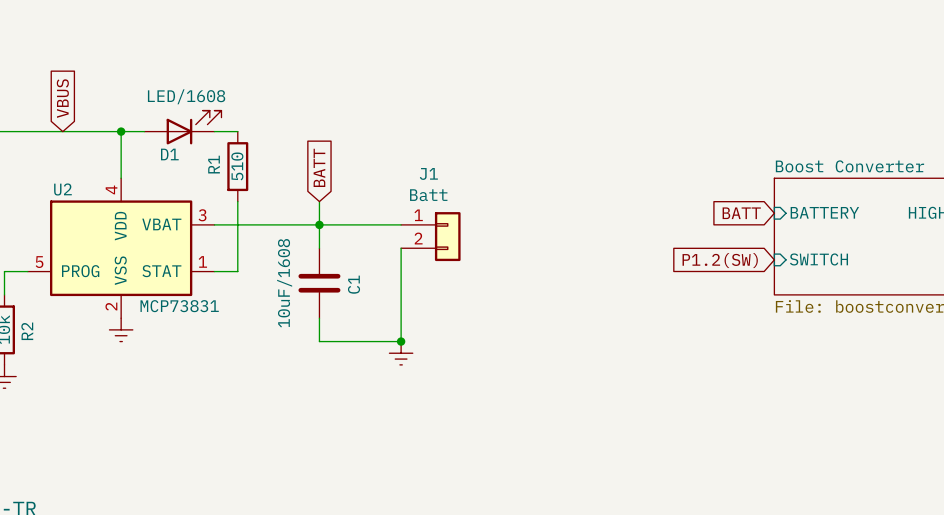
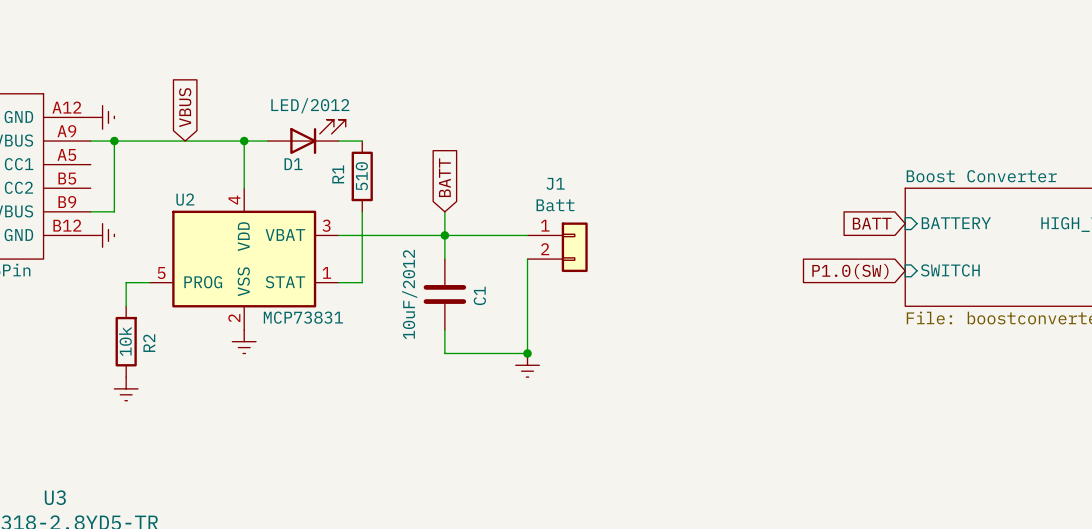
D1 value: LED/1608 (186, 96) -> LED/2012 (310, 105)
global label: P1.2(SW) (720, 260) -> P1.0(SW) (850, 271)
C1 value: 10uF/1608 (284, 283) -> 10uF/2012 (409, 294)

